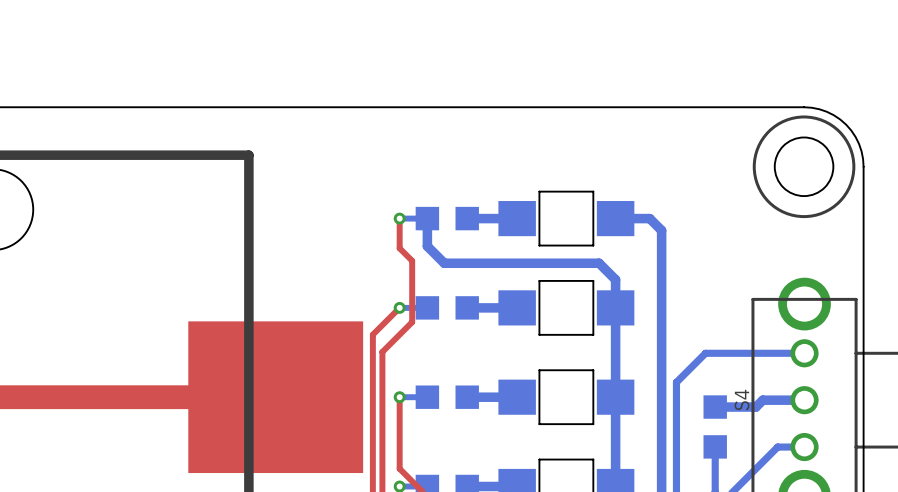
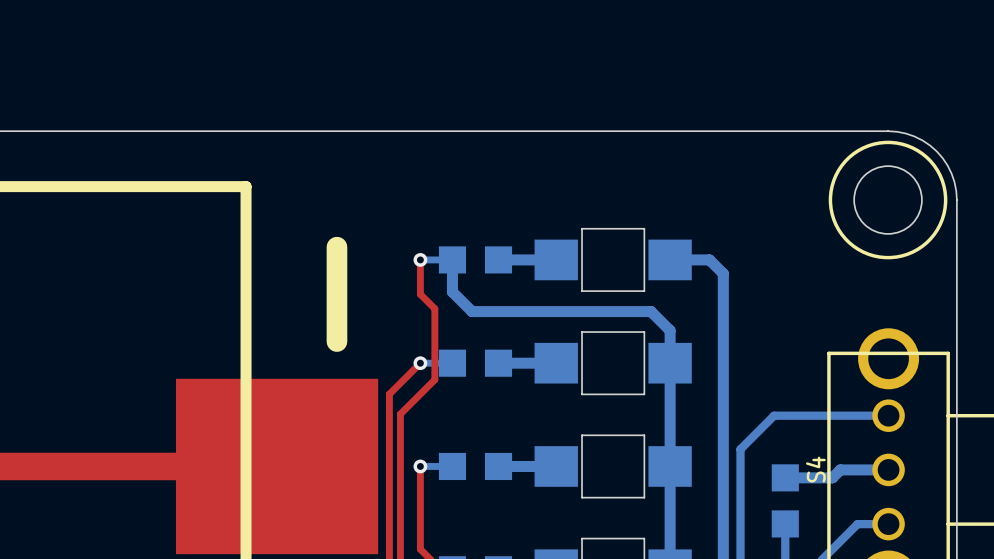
part text: none -> - (336, 294)

